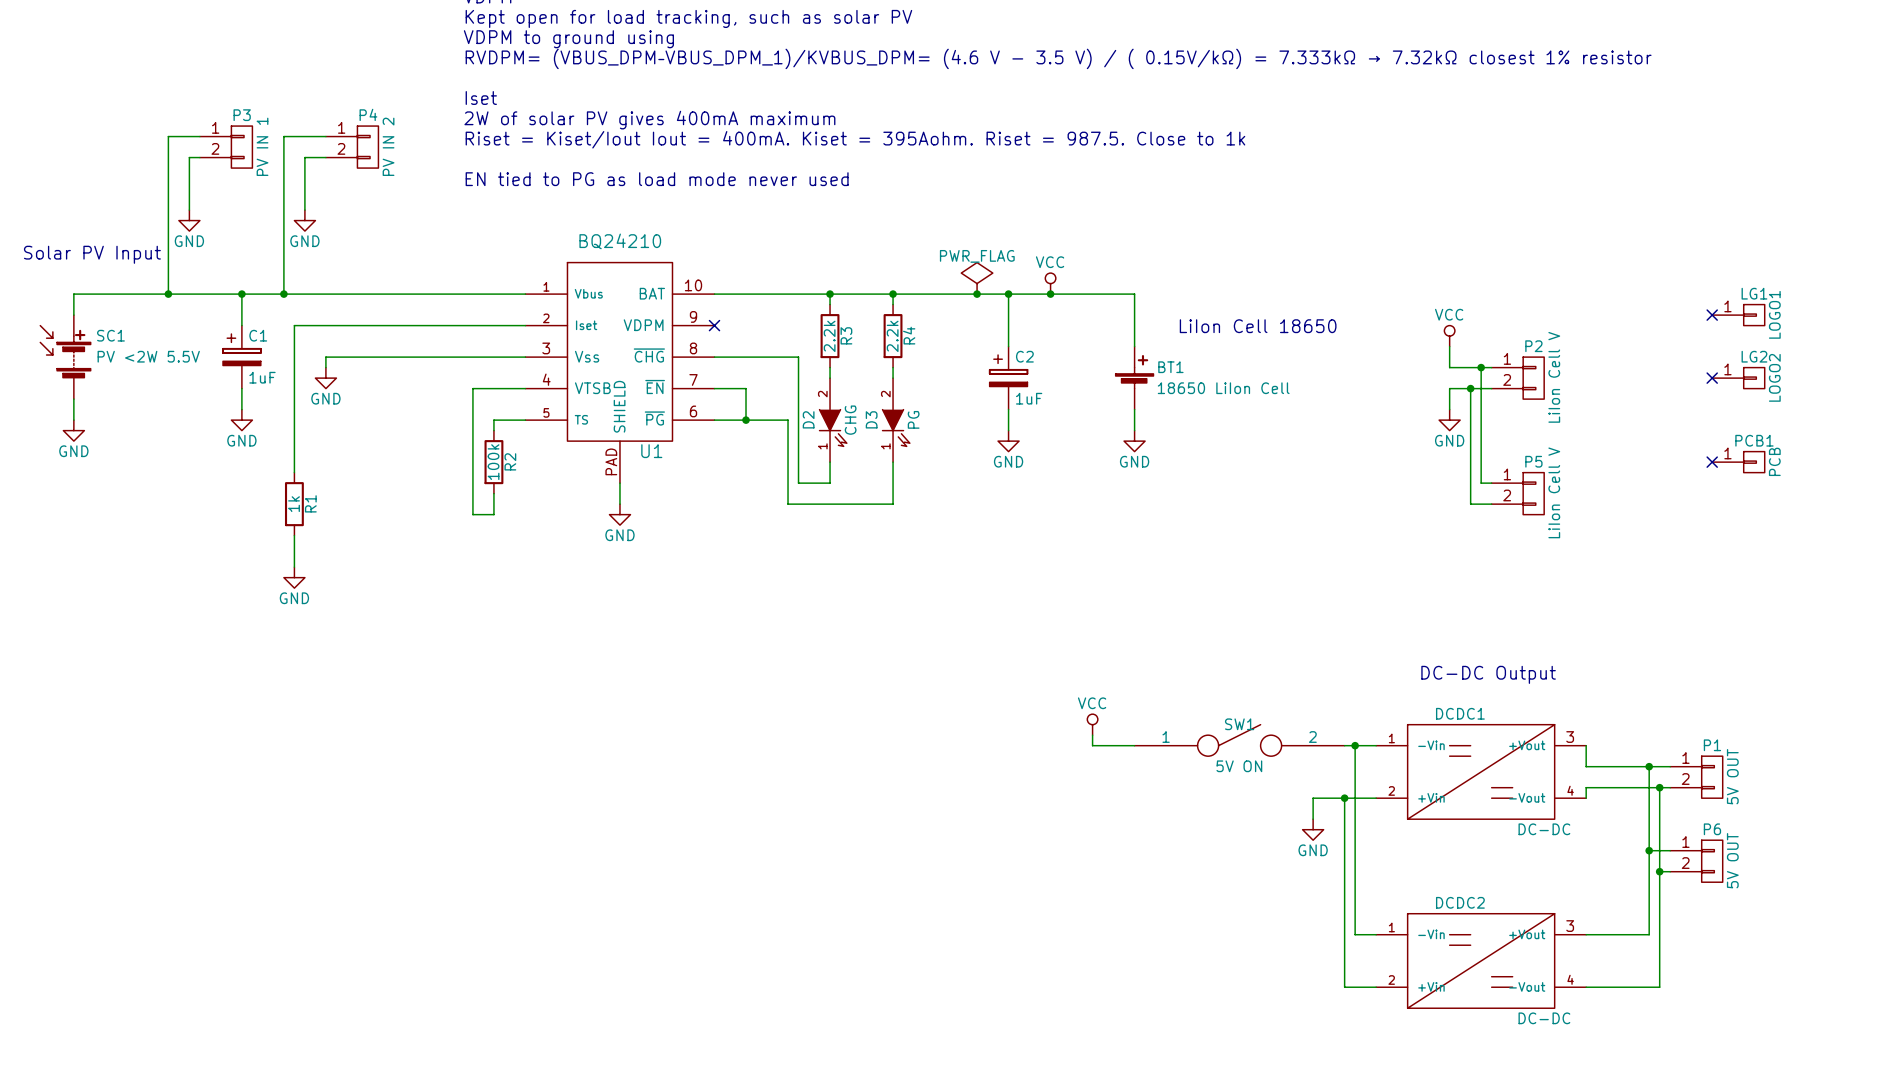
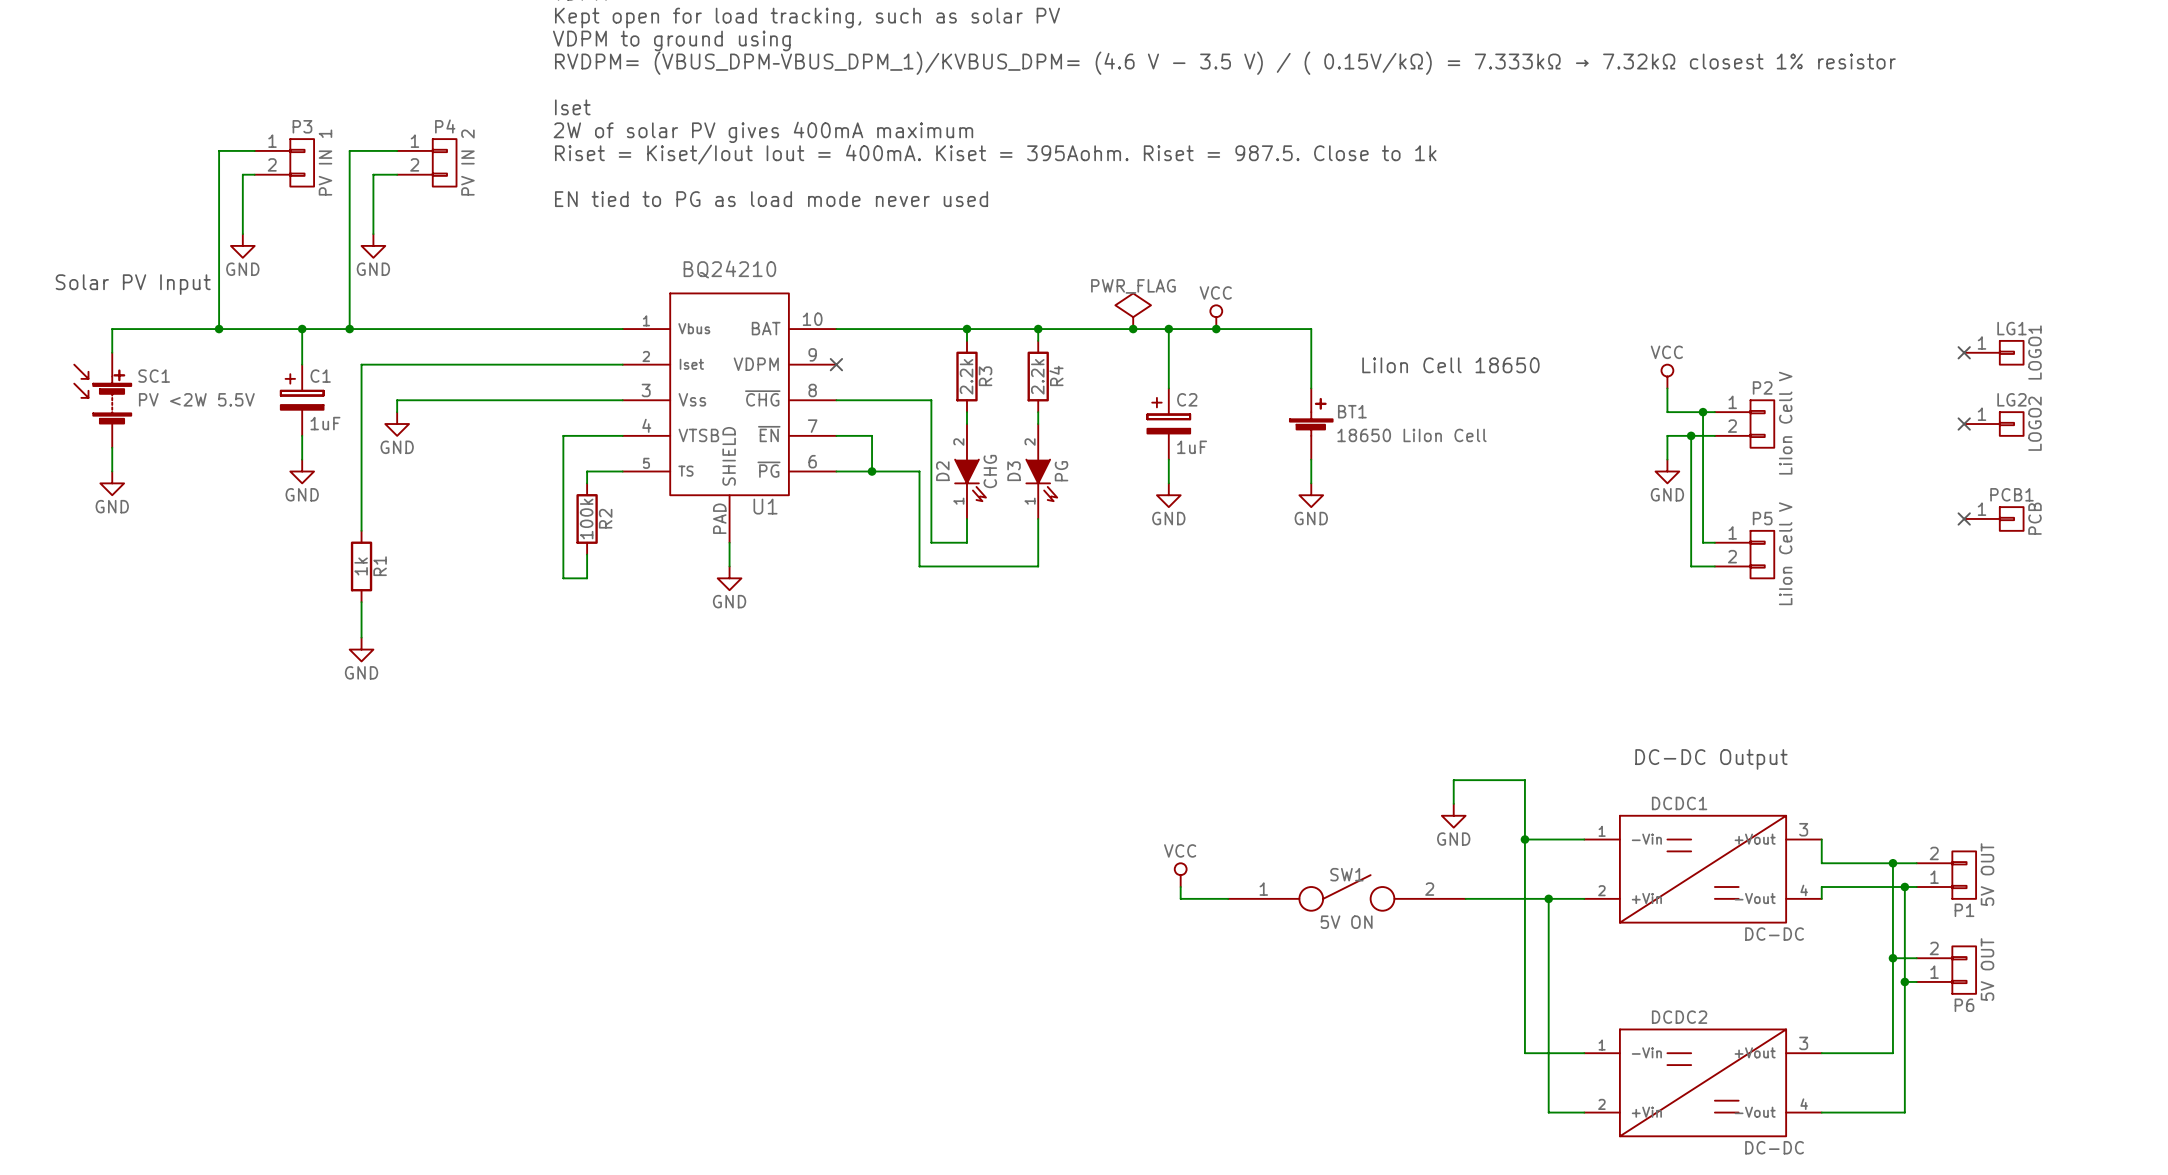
power symbol position: VCC (1092, 724) -> VCC (1180, 875)
wire: (1092, 735) (1092, 745) (1134, 745) -> (1180, 887) (1180, 898) (1228, 898)
SW1 position: (1239, 740) -> (1346, 892)
wire: (1355, 745) (1355, 934) -> (1453, 803) (1453, 780) (1524, 780) (1524, 1053) (1560, 1053)
junction position: (1355, 745) -> (1524, 839)
P1 flip: as is (1712, 777) -> up-down (1964, 875)
wire: (1313, 798) (1313, 819) -> (1513, 898) (1465, 898)
power symbol position: GND (1313, 829) -> GND (1453, 815)
P6 flip: as is (1712, 861) -> up-down (1964, 970)

